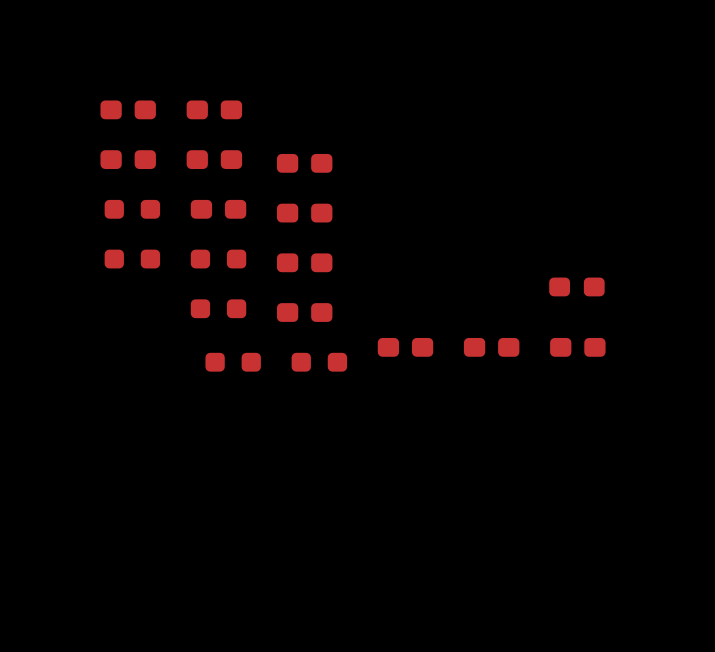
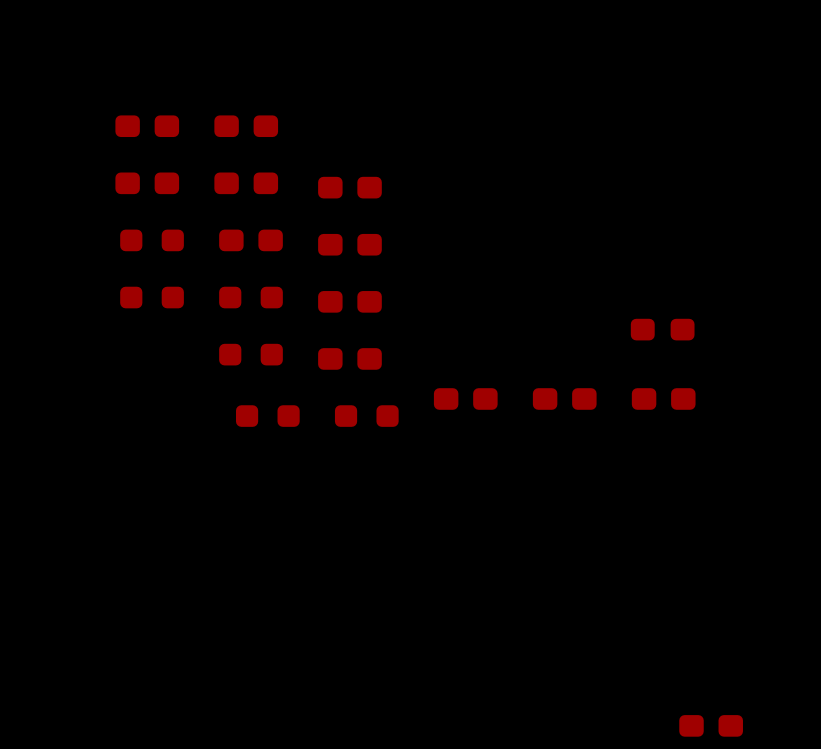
part: none -> (711, 725)

